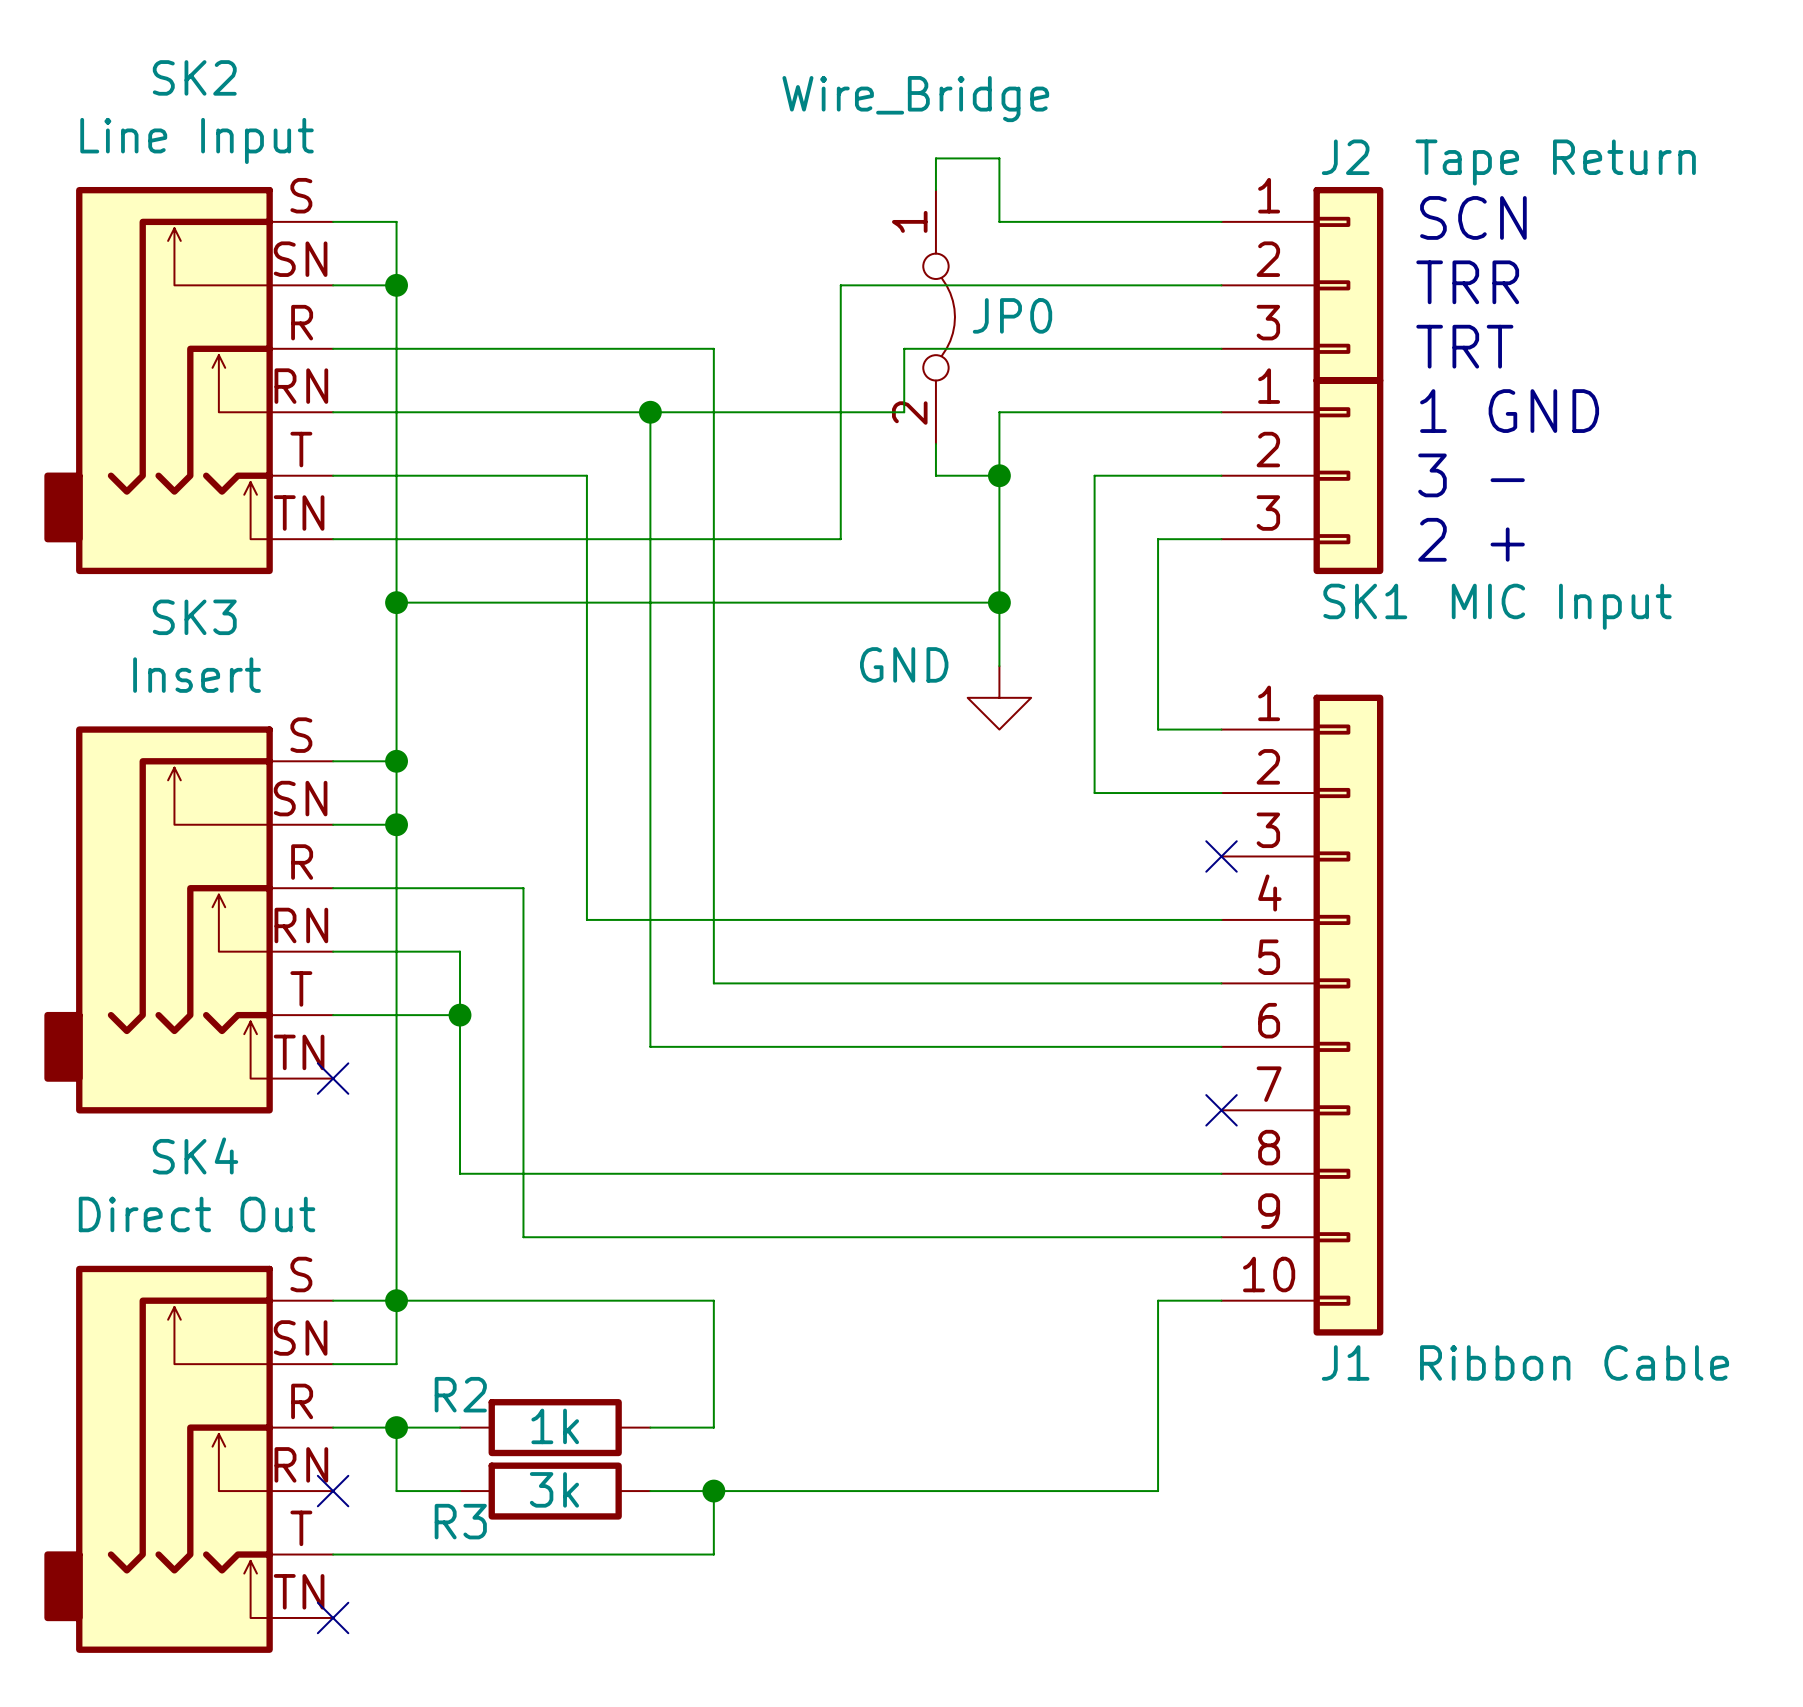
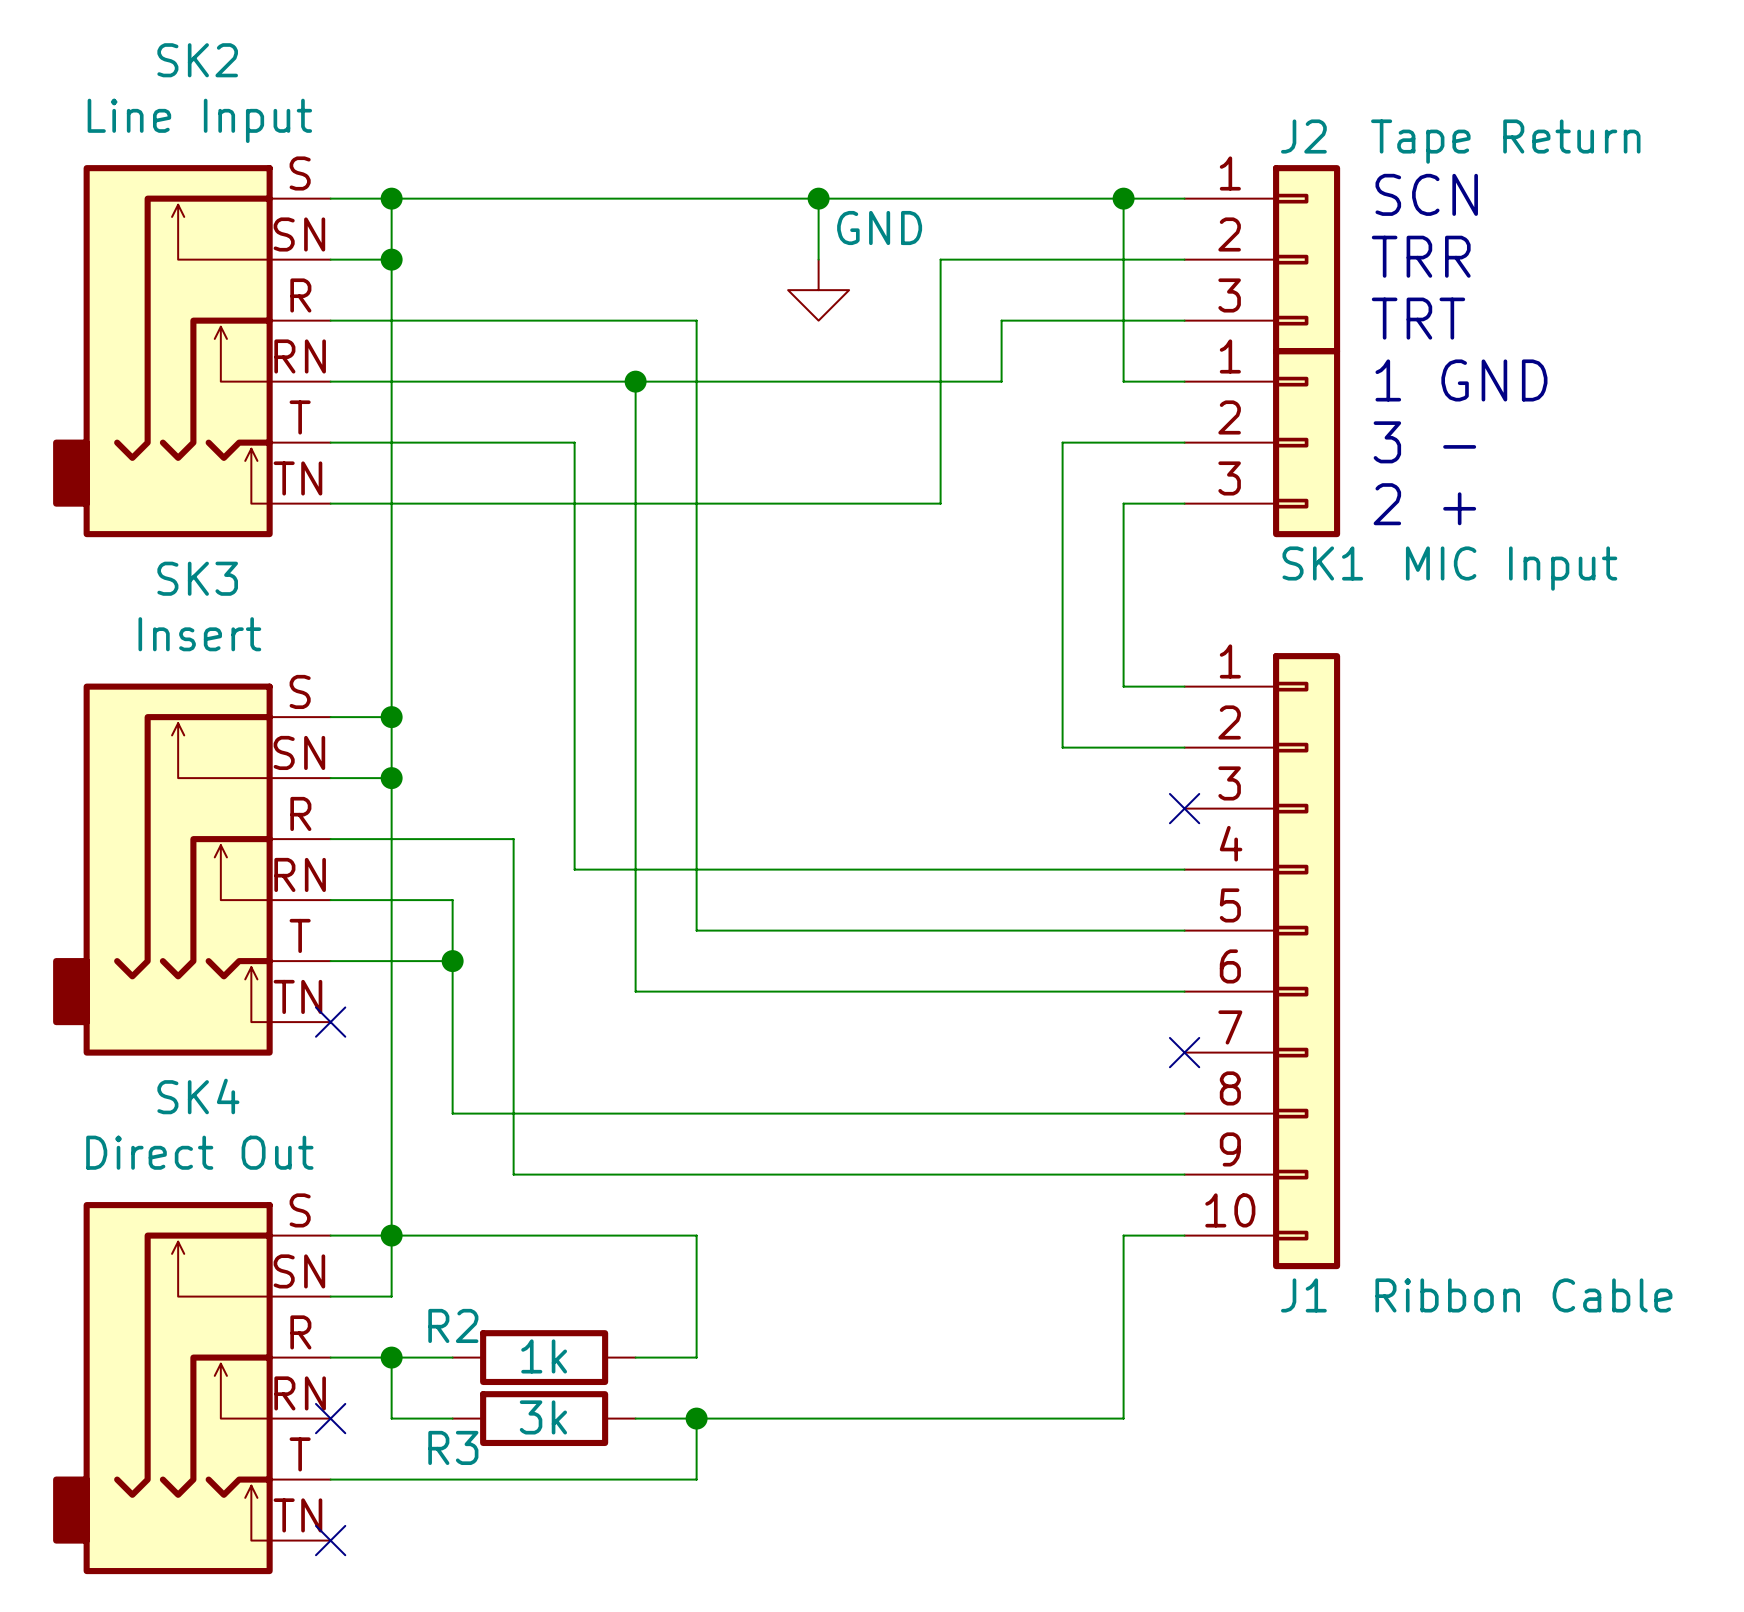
wire: (935, 190) (935, 158) (999, 158) (999, 221) -> (391, 198) (971, 198)
junction: none -> (391, 198)
wire: none -> (818, 198) (818, 259)
junction: none -> (818, 198)
wire: none -> (1123, 198) (1123, 381)
junction: none -> (1123, 198)
wire: (967, 285) (840, 285) (840, 539) -> (940, 259) (940, 503) (818, 503)
JP0: Wire_Bridge (939, 317) -> none
wire: (1031, 348) (904, 348) (904, 412) -> (971, 381) (879, 381)
wire: (999, 412) (999, 666) -> none
wire: (1031, 412) (1158, 412) -> (1001, 381) (1001, 320)
wire: (935, 443) (935, 475) (999, 475) -> none
junction: (999, 475) -> none
wire: (396, 602) (999, 602) -> none
junction: (396, 602) -> none
junction: (999, 602) -> none
power symbol text position: GND (904, 664) -> GND (879, 228)
power symbol position: GND (999, 697) -> GND (818, 290)

